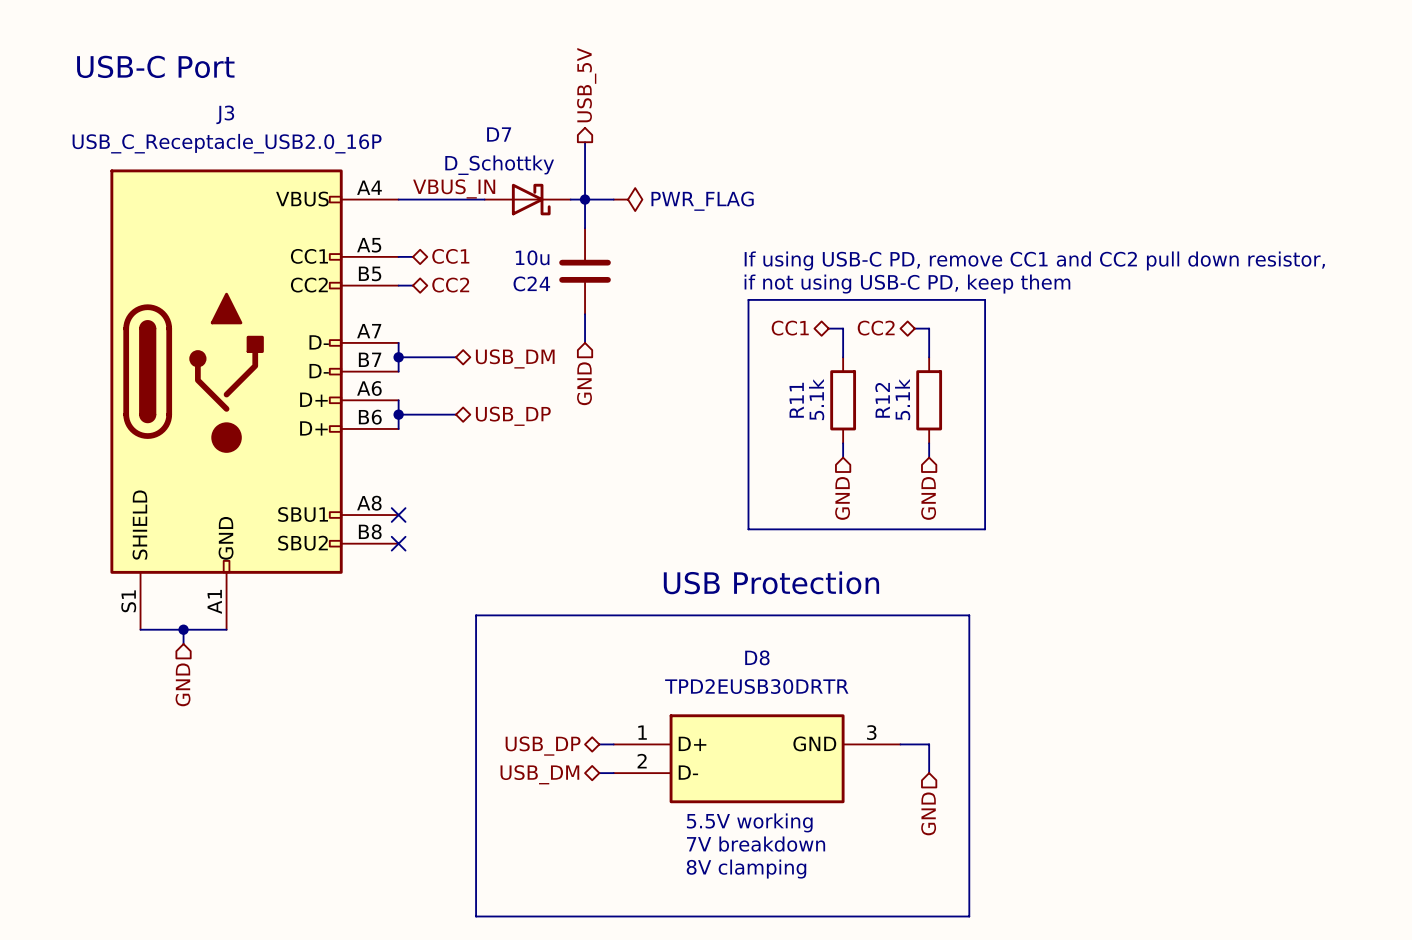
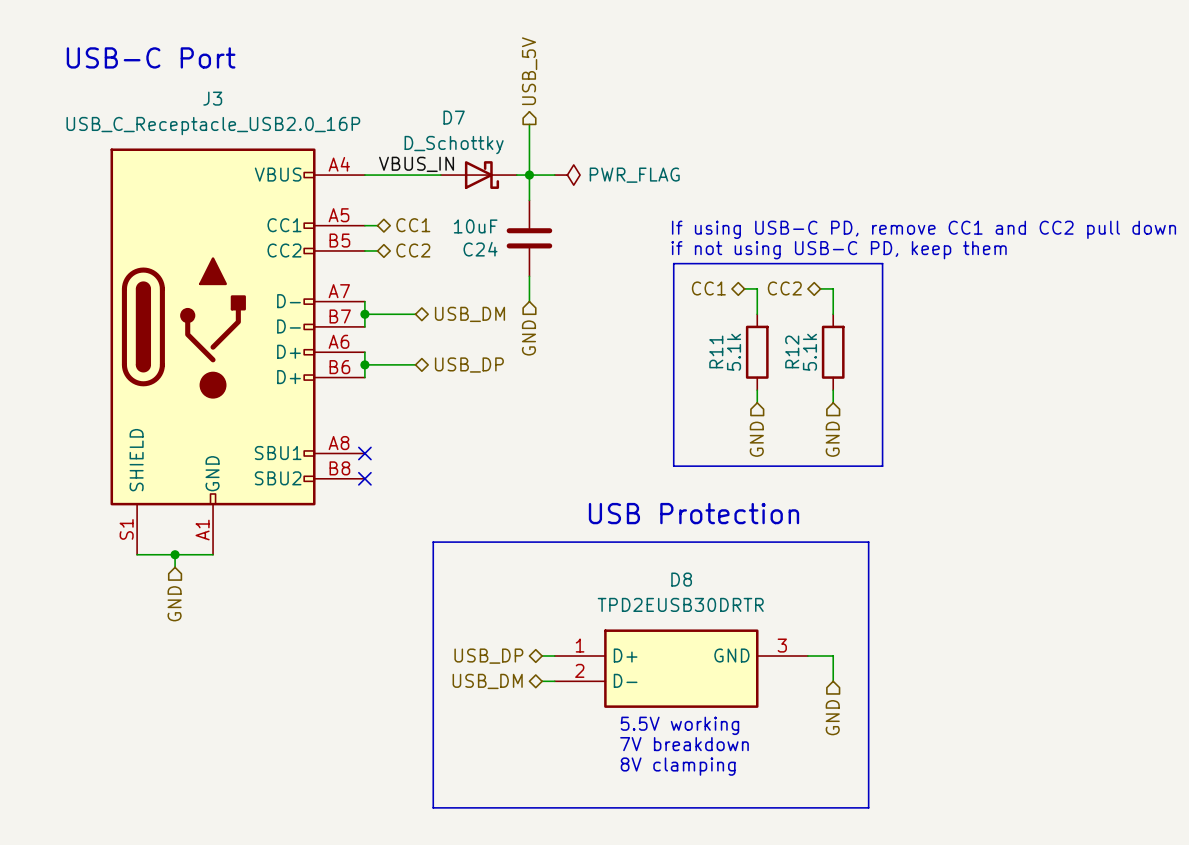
C24 value: 10u (532, 257) -> 10uF (475, 226)

